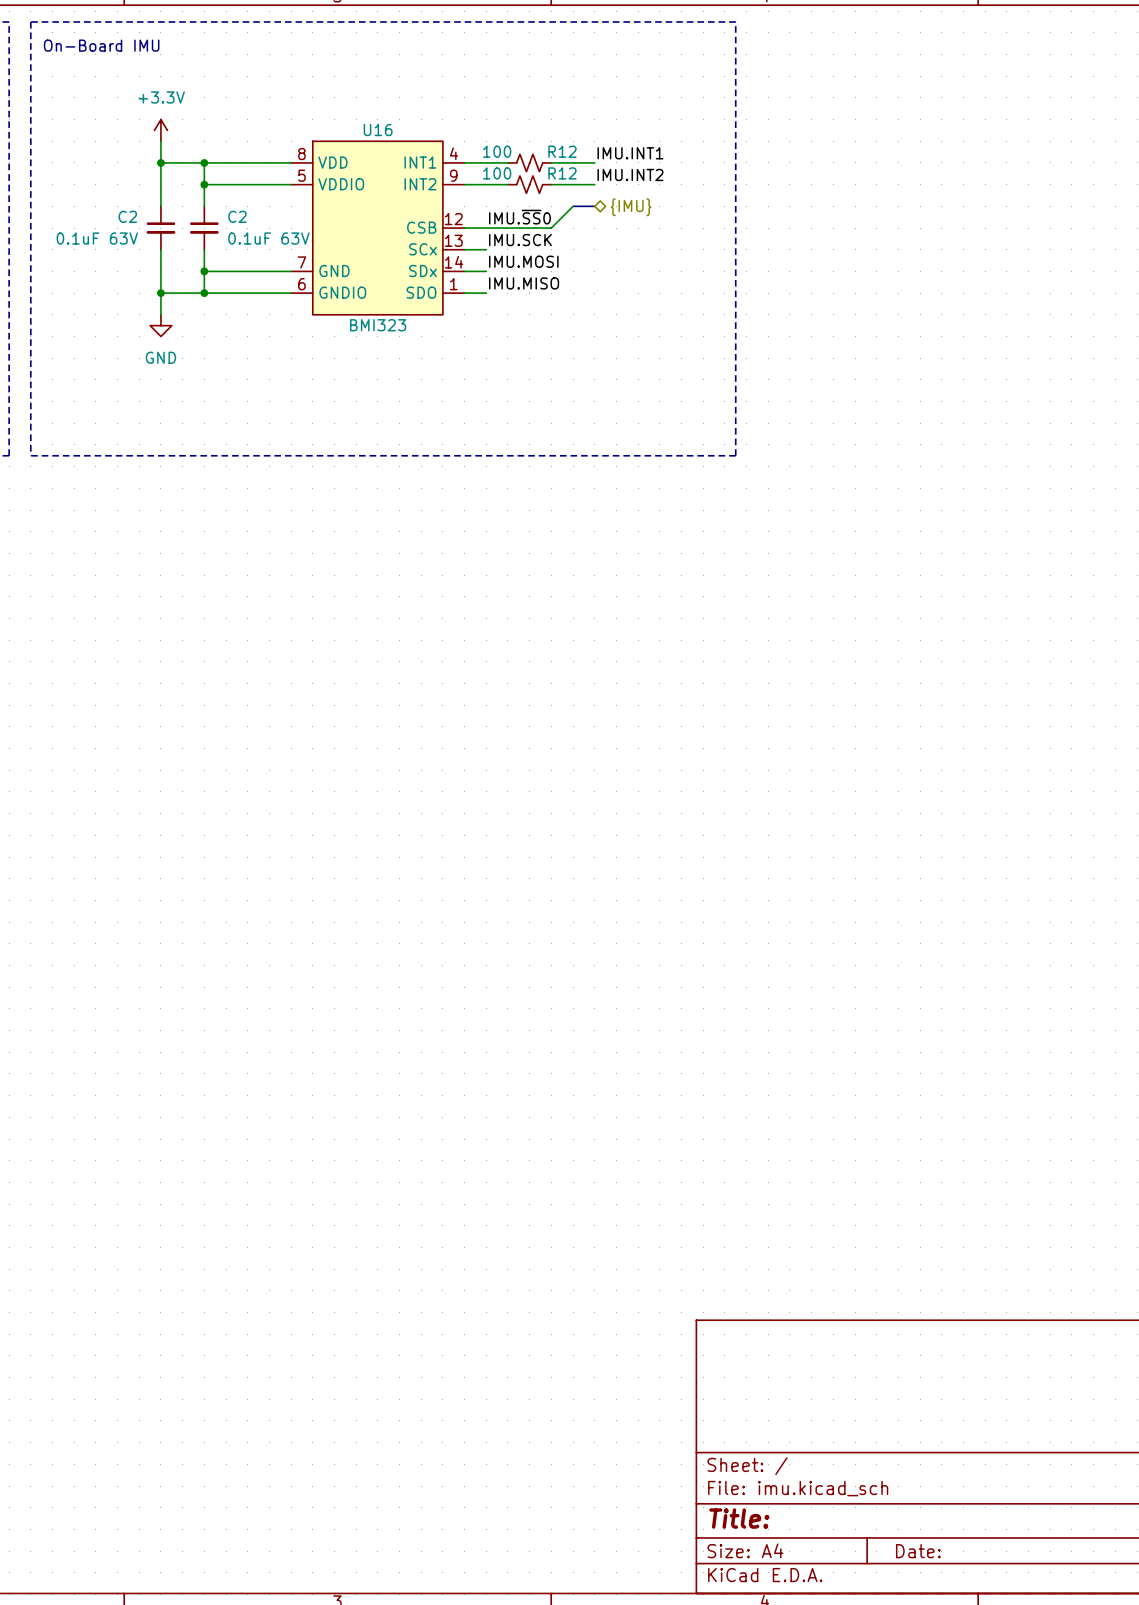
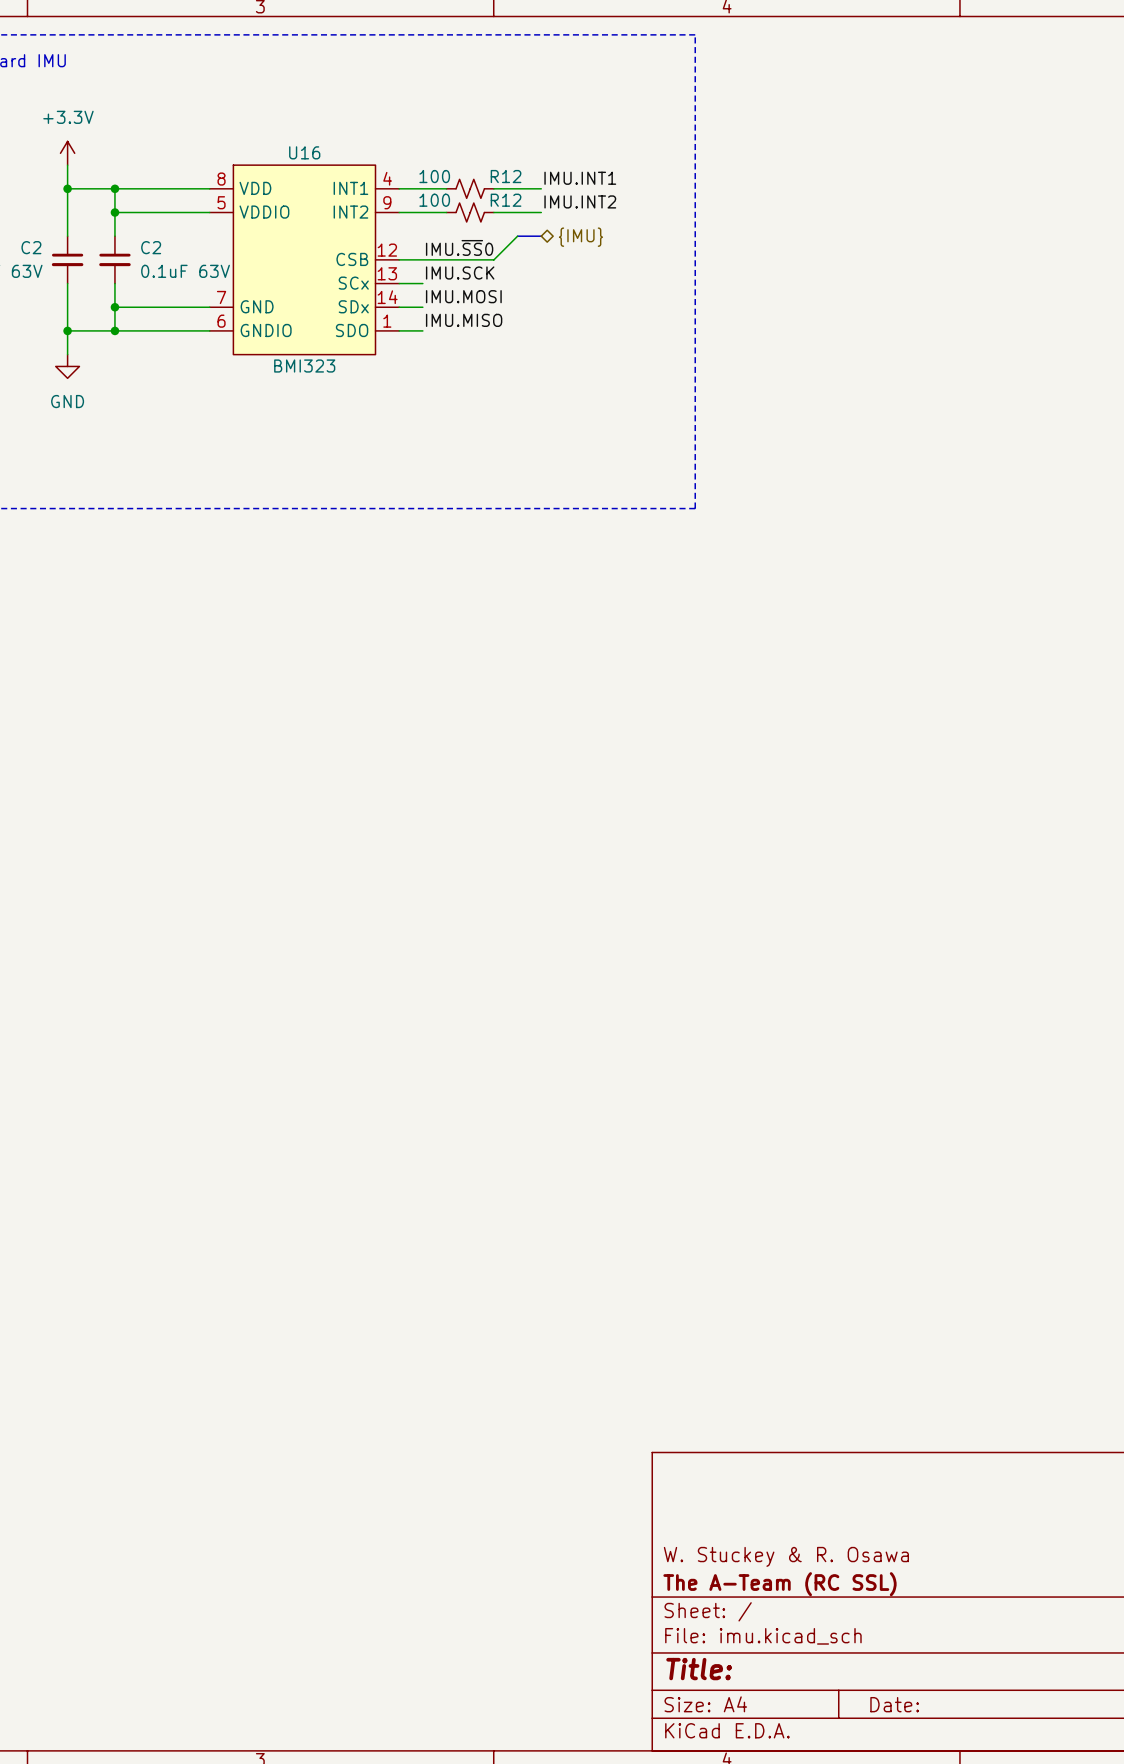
title block: none -> W. Stuckey & R. Osawa (786, 1556)
title block: none -> The A-Team (RC SSL) (779, 1584)

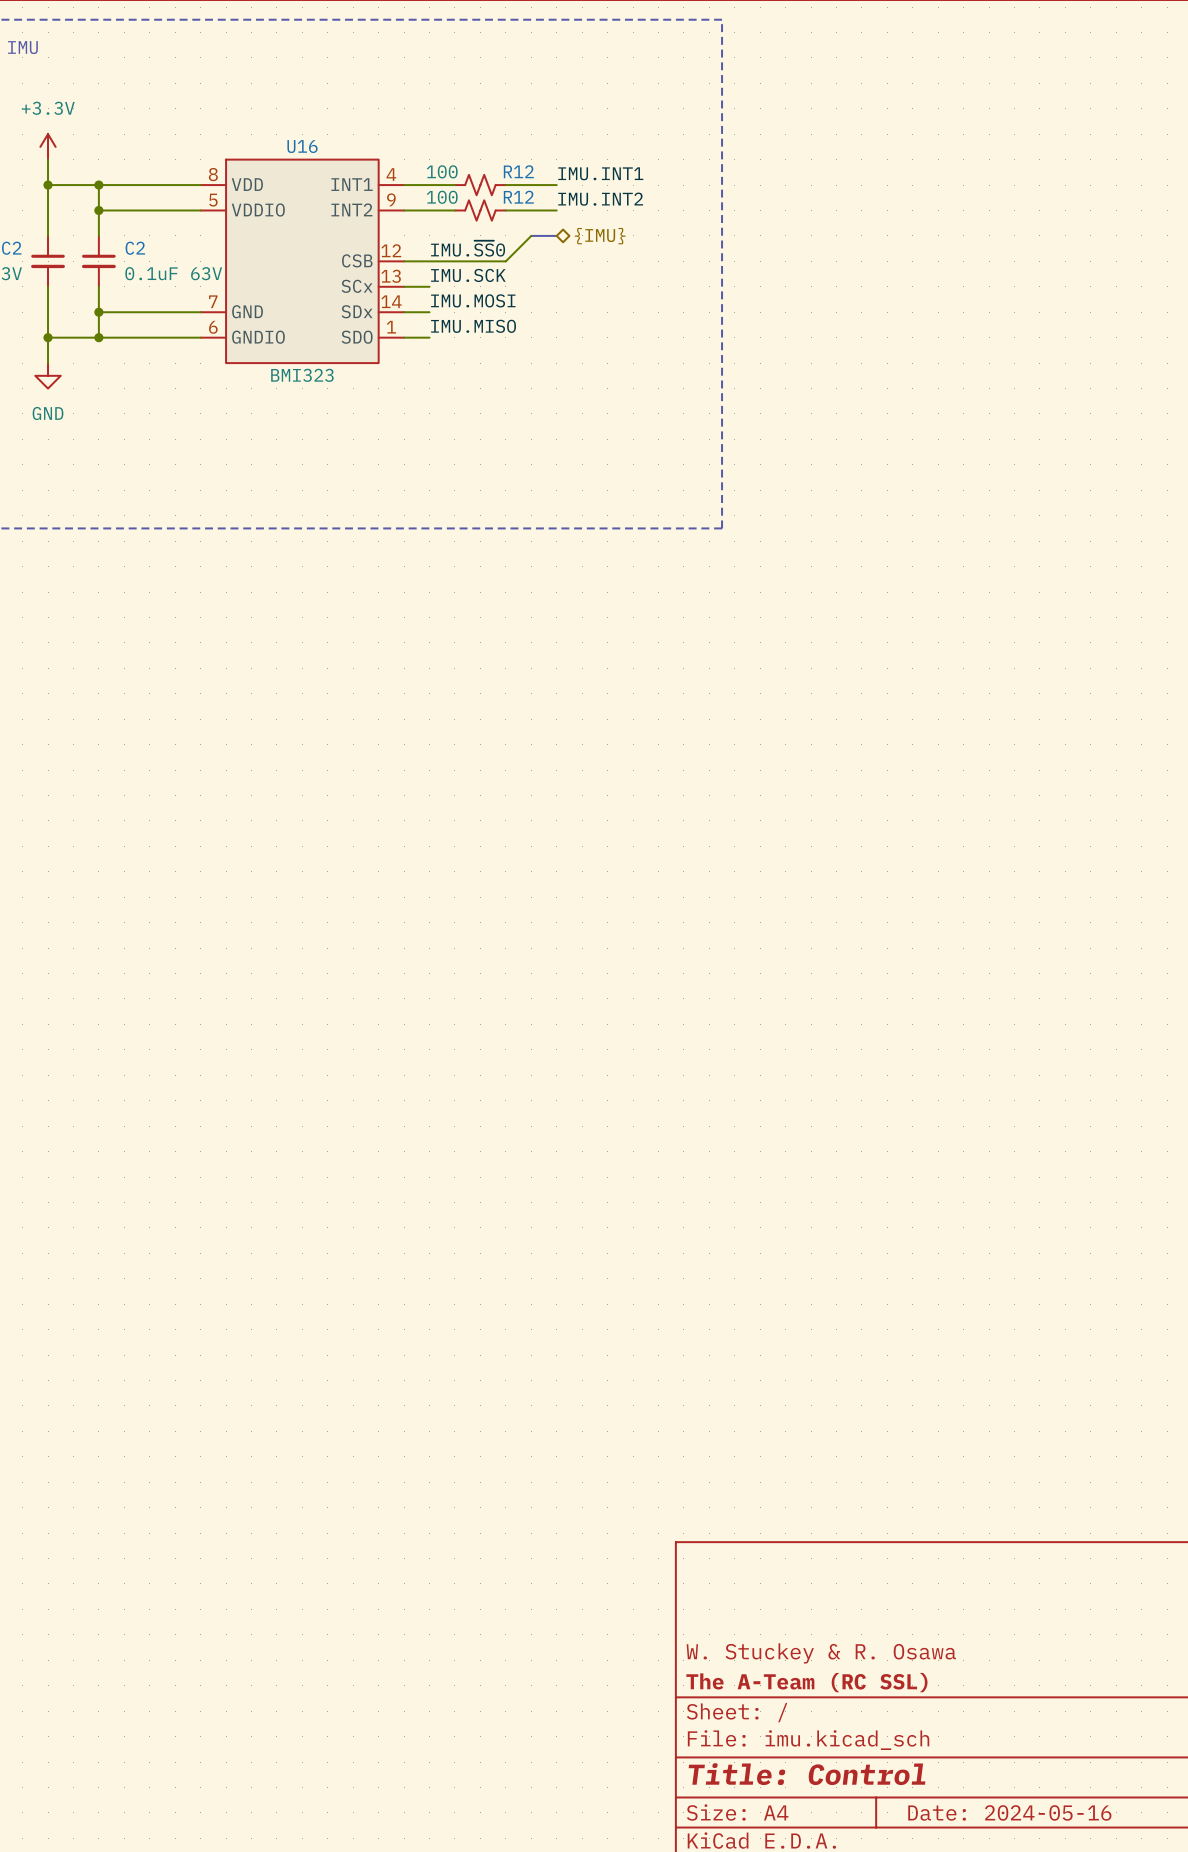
title block: Title: (699, 1669) -> Title: Control (807, 1774)
title block: Date: (894, 1704) -> Date: 2024-05-16 (1009, 1812)

